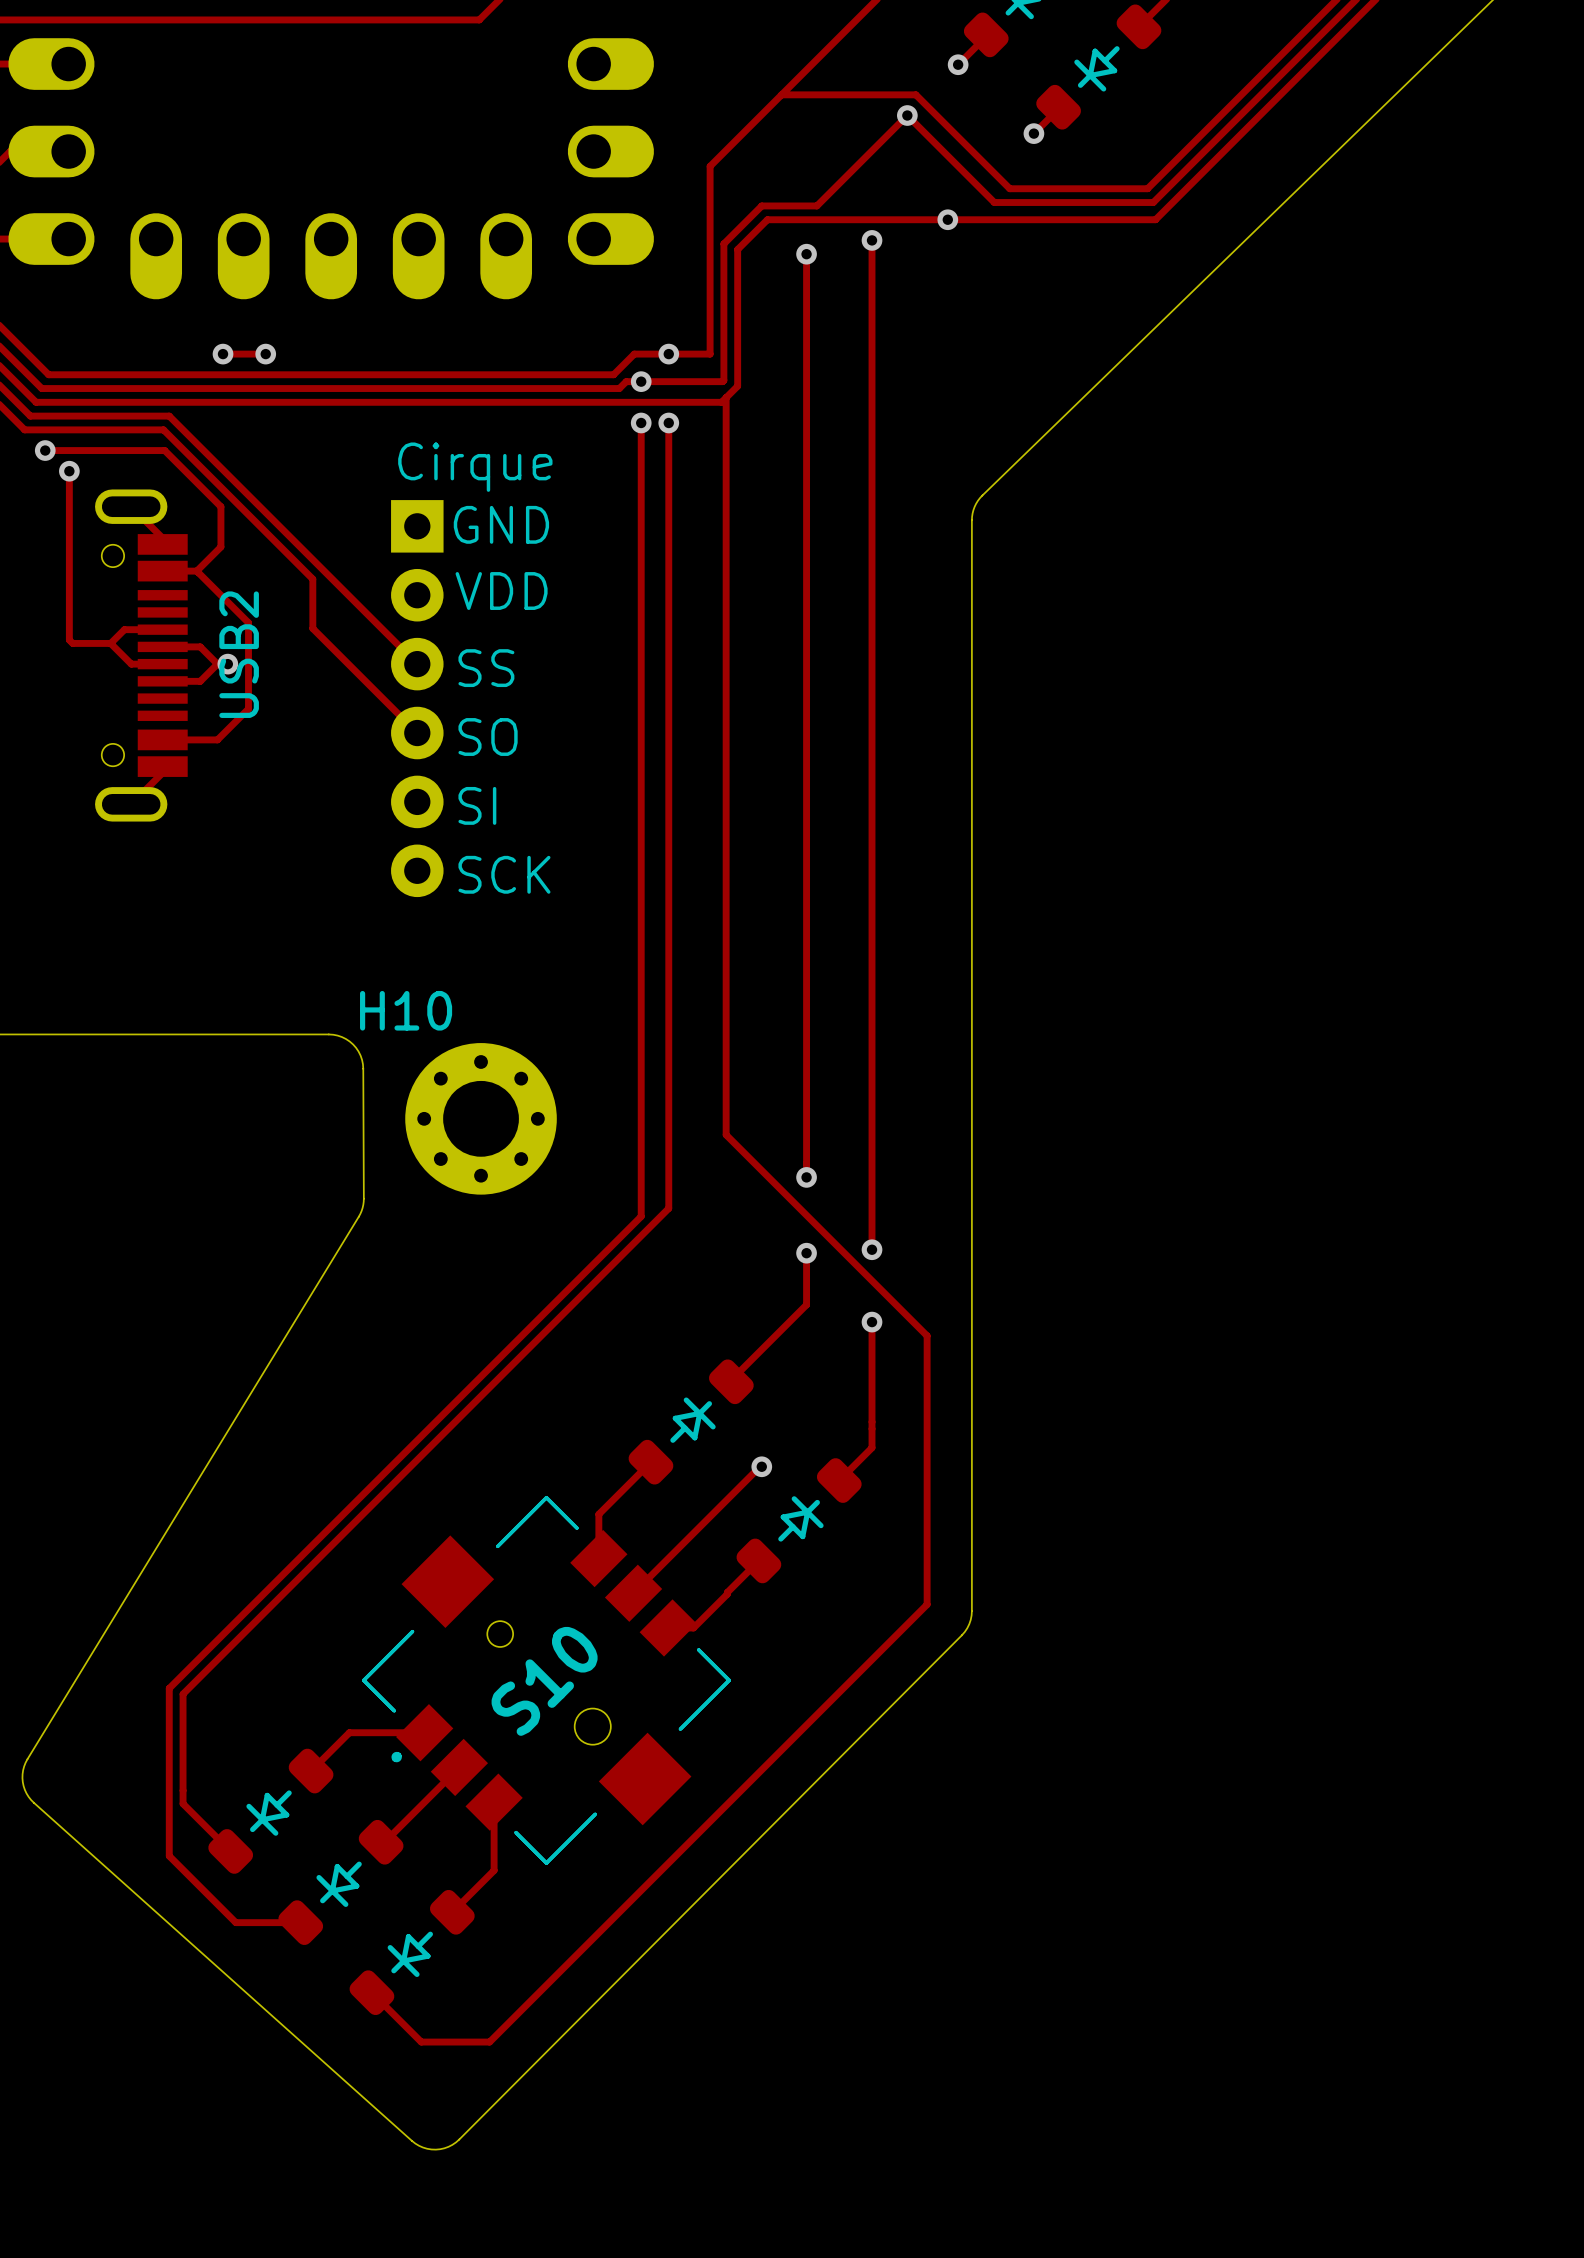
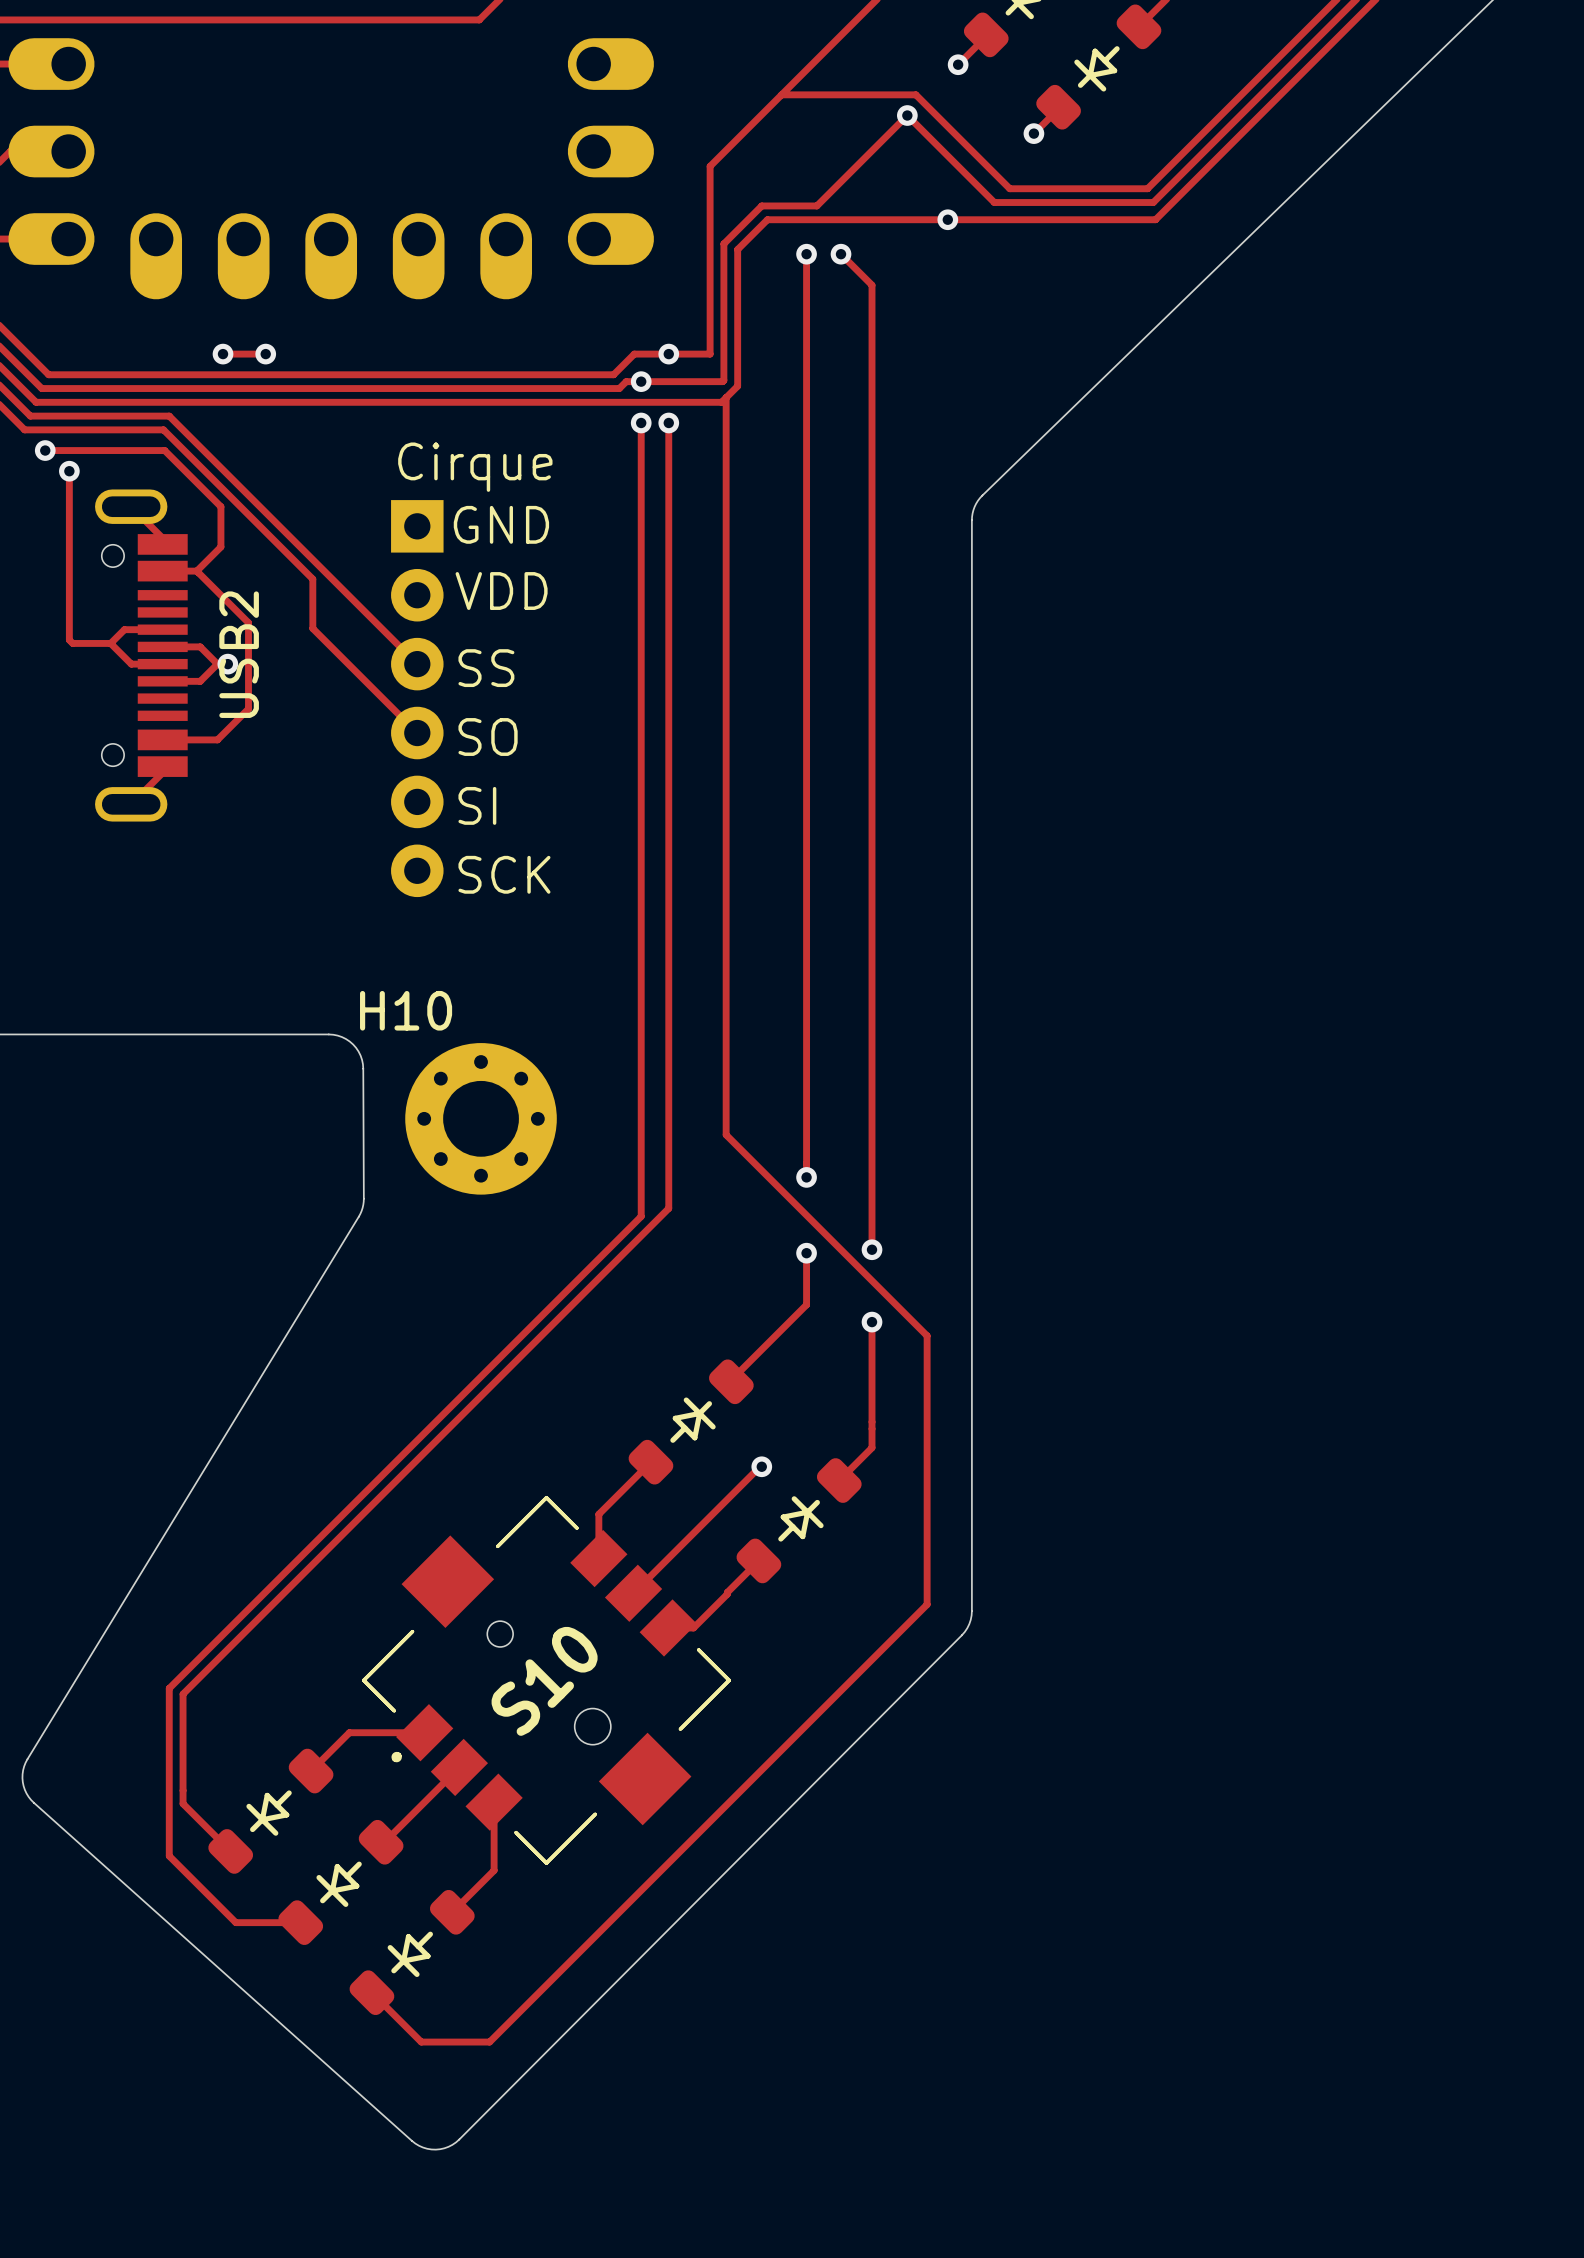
track: (872, 240) (872, 285) -> (841, 254) (872, 285)
via position: (872, 240) -> (841, 254)

